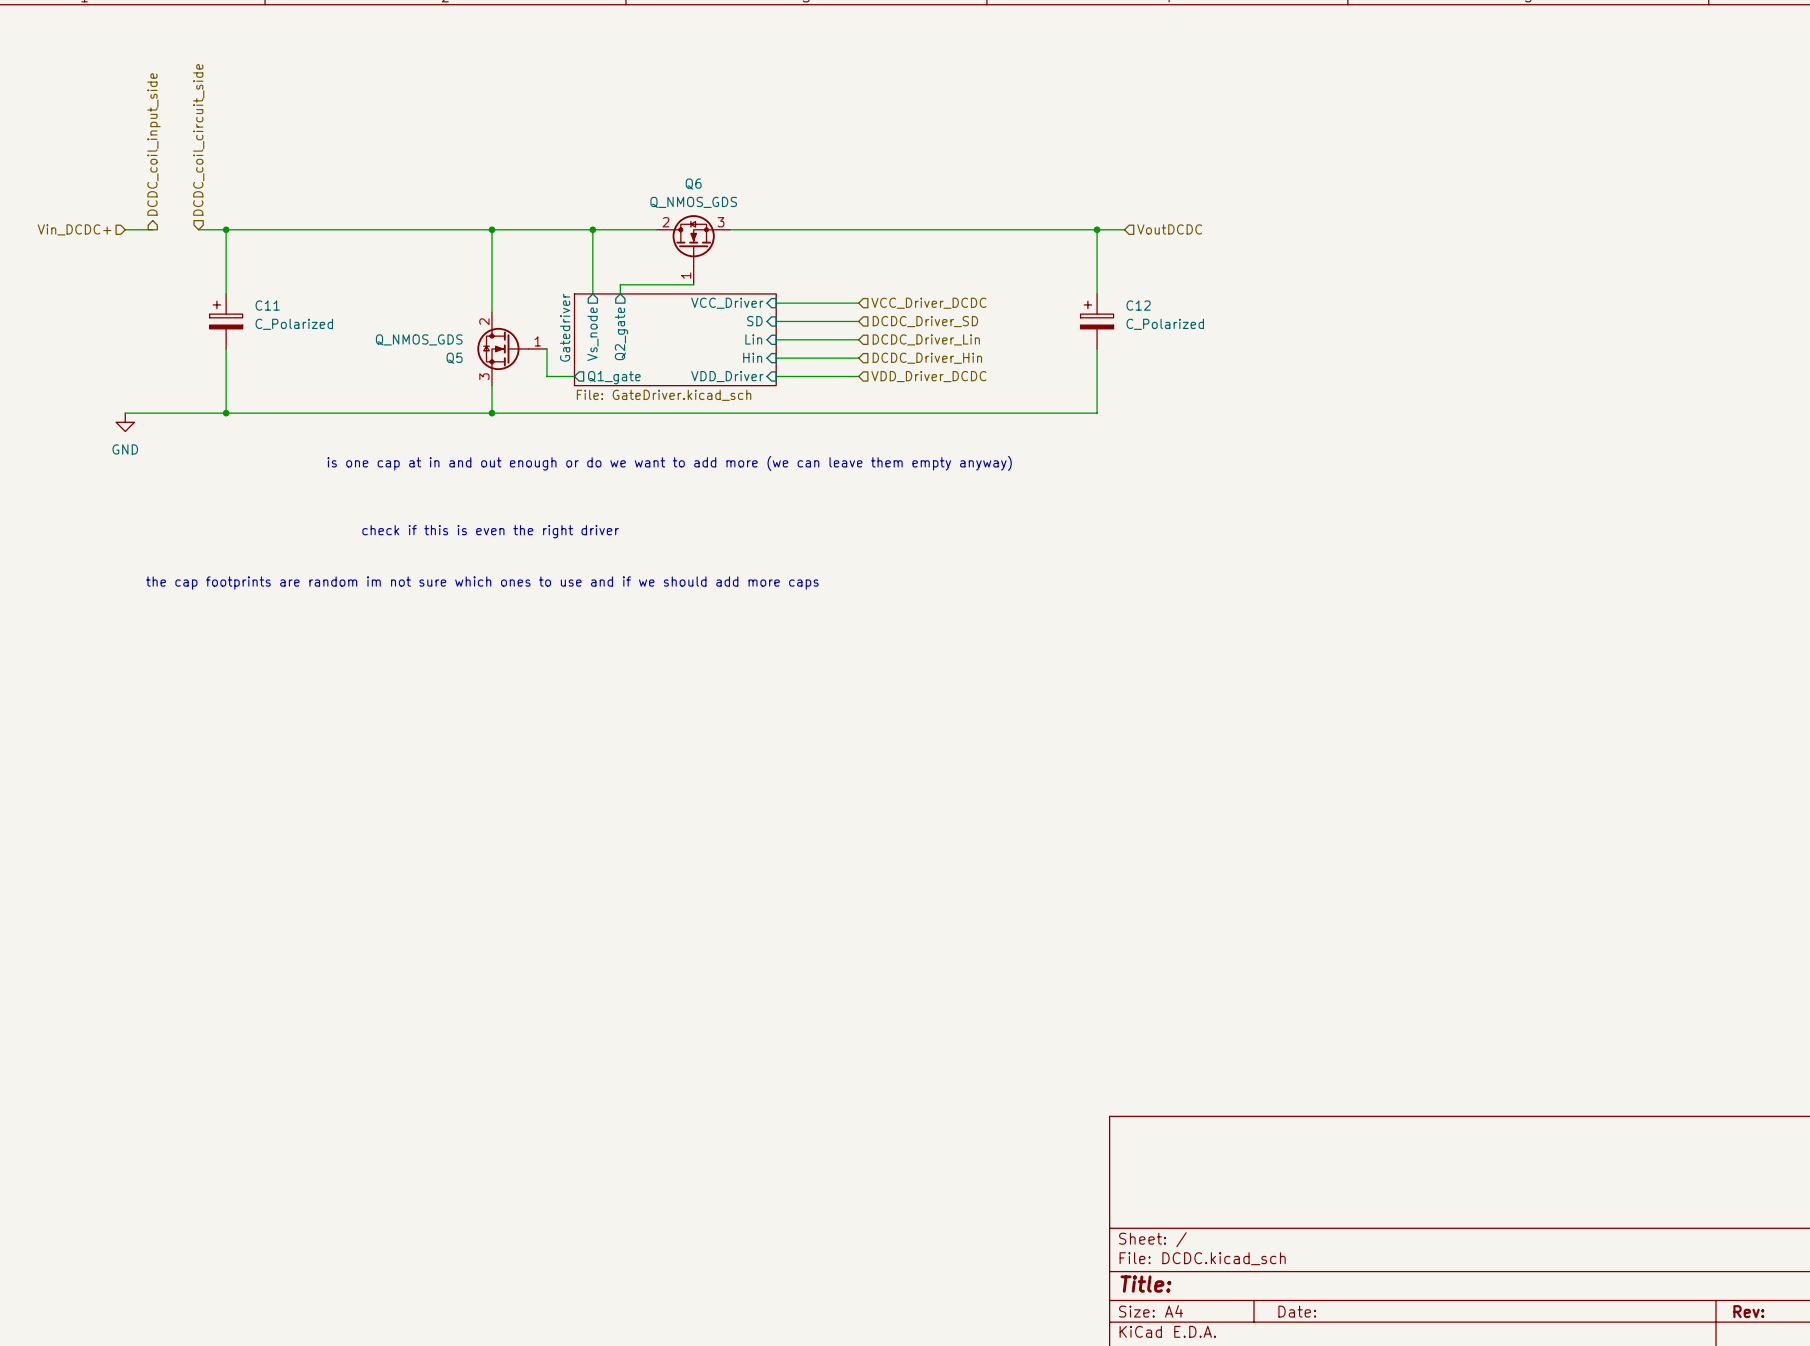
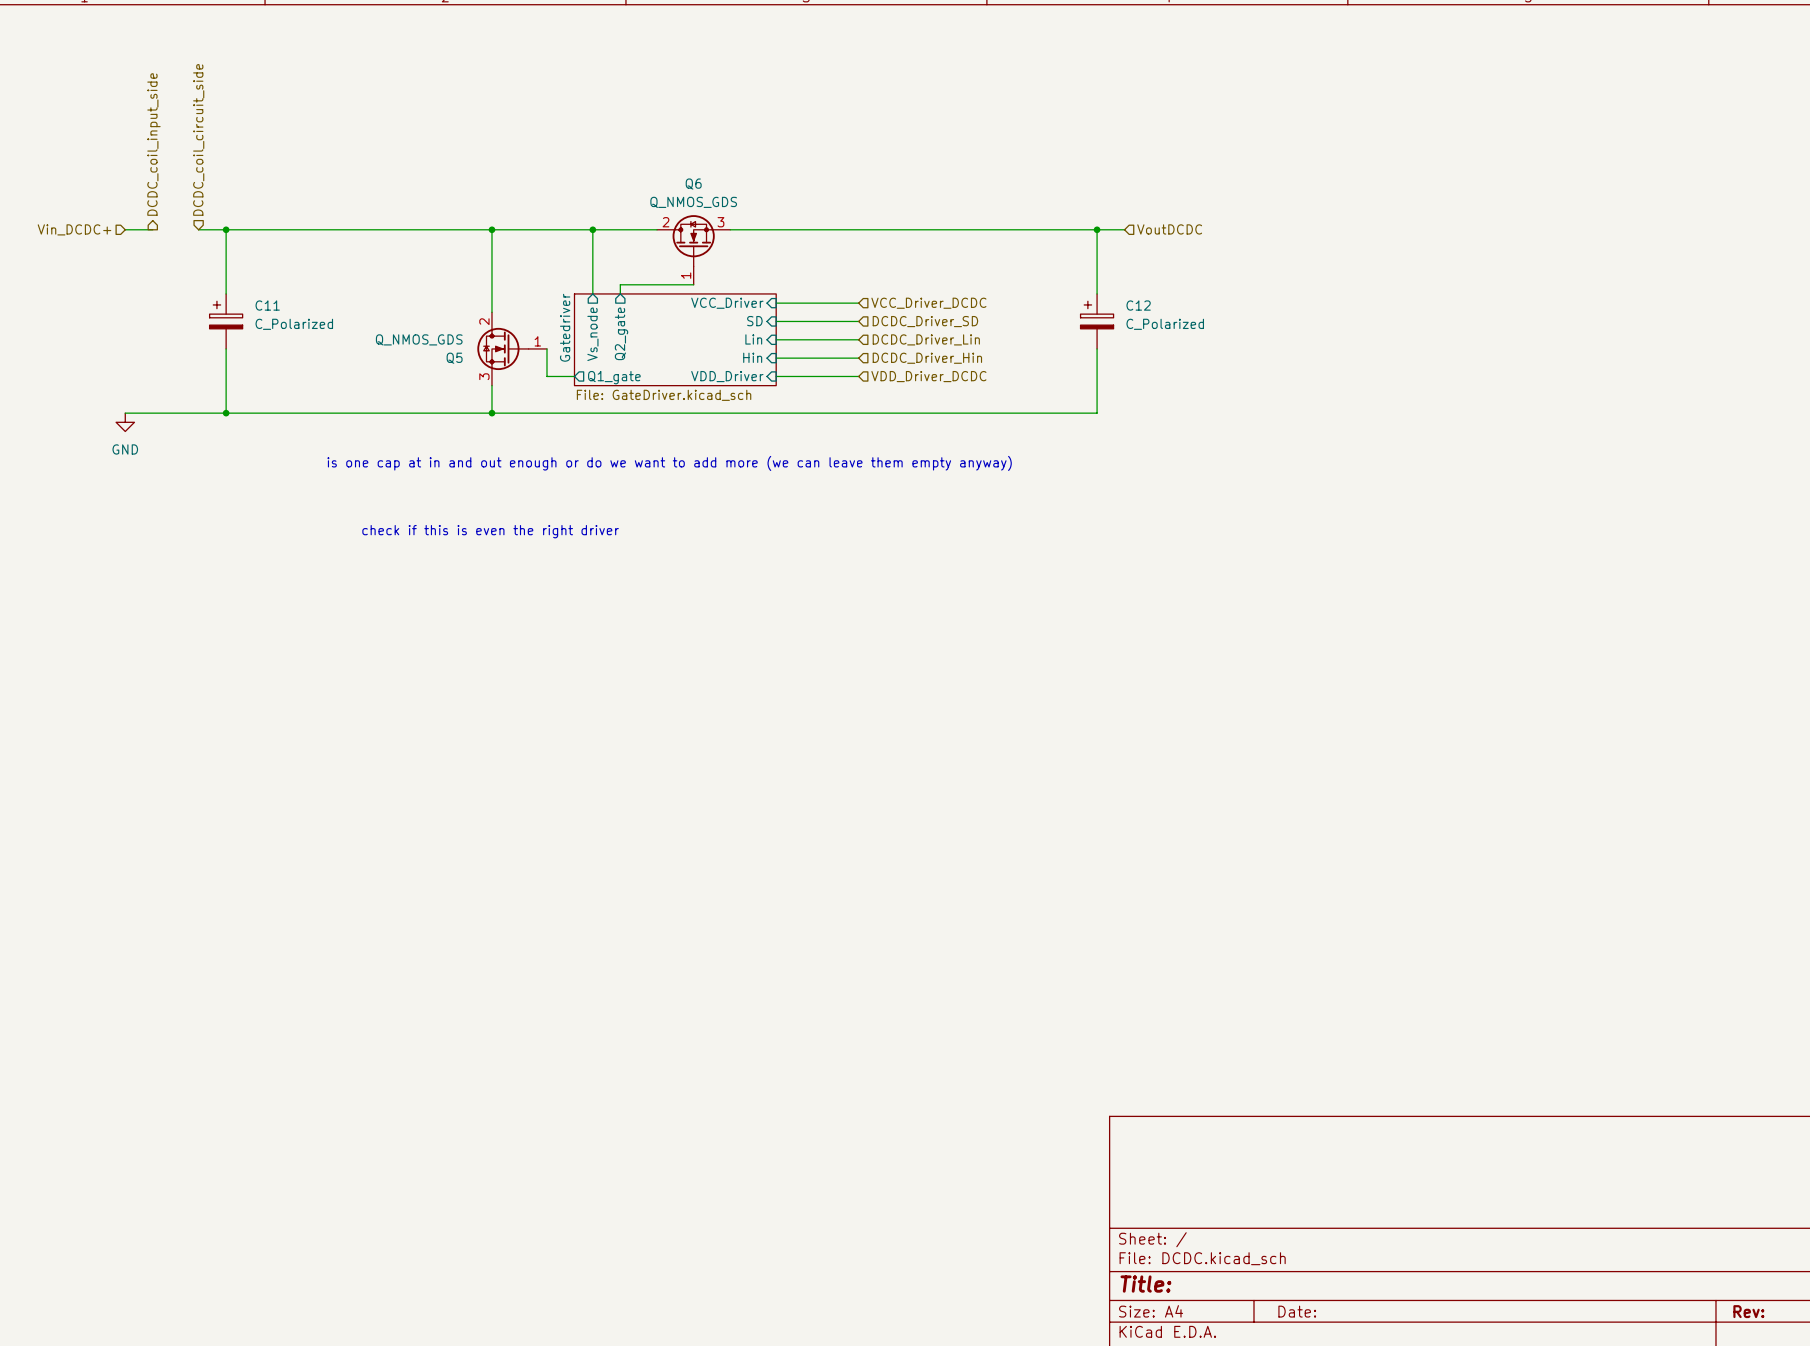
text: the cap footprints are random im not sure which ones to use and if we should add more caps (482, 583) -> none

